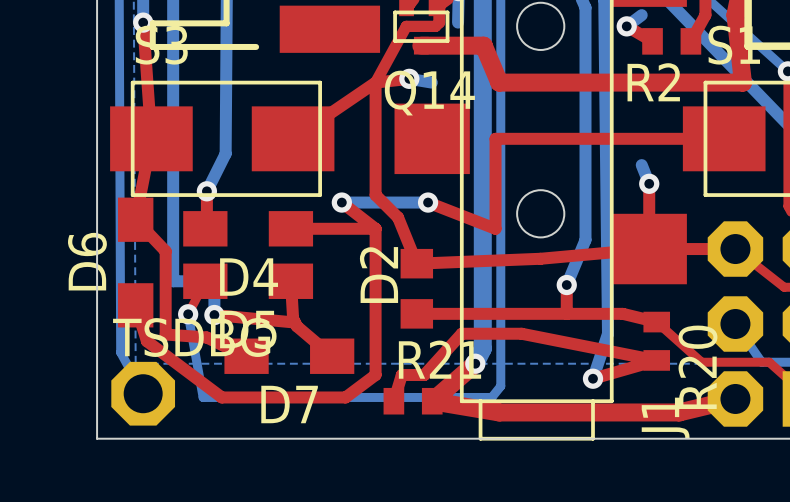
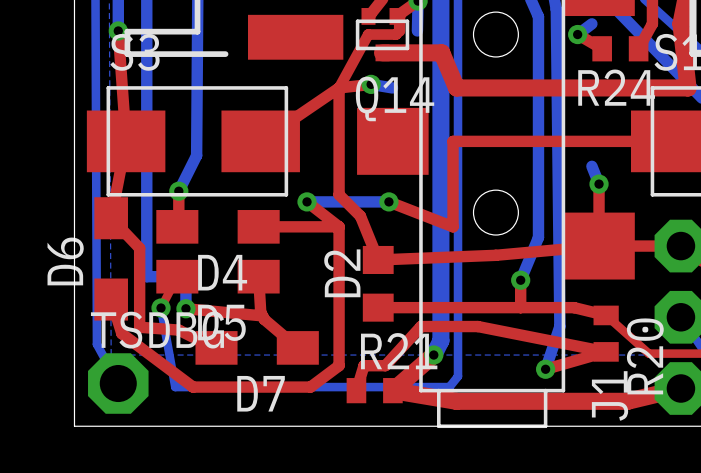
R2 name: R2 (653, 82) -> R24 (616, 87)

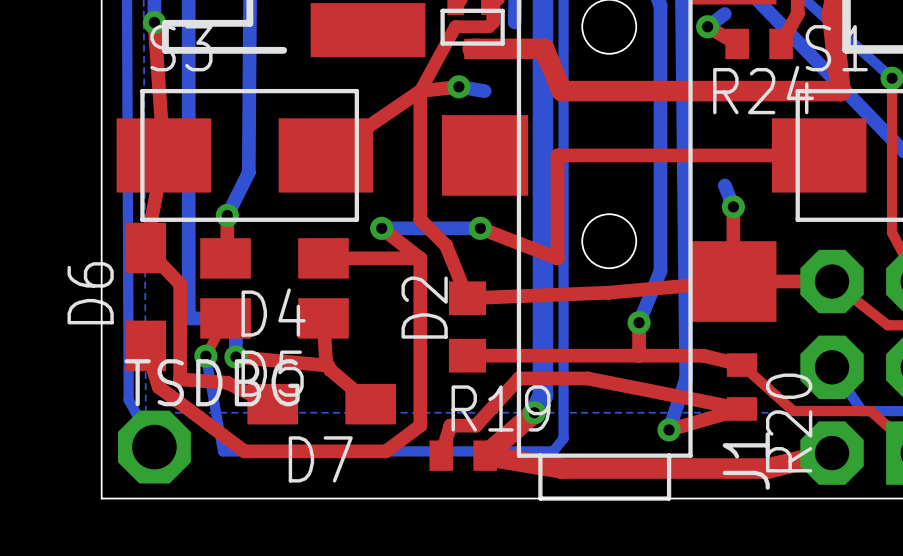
Q14 name: Q14 (395, 98) -> none
R21 name: R21 (399, 351) -> R19 (501, 408)

